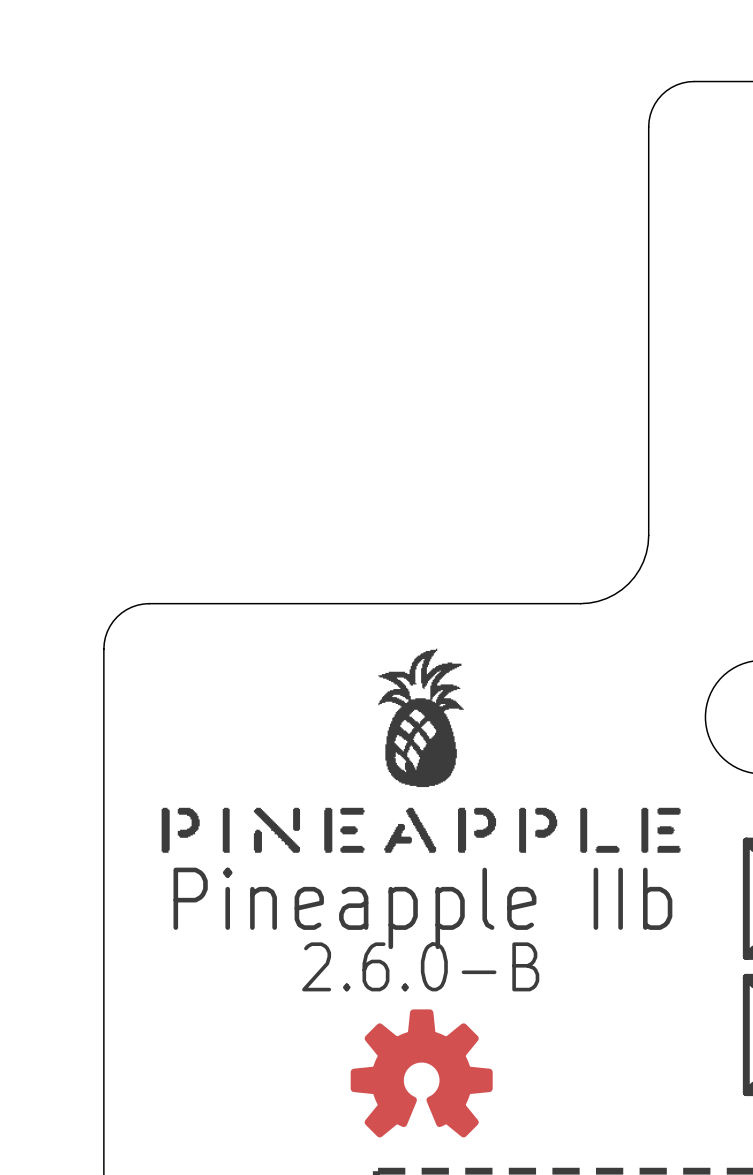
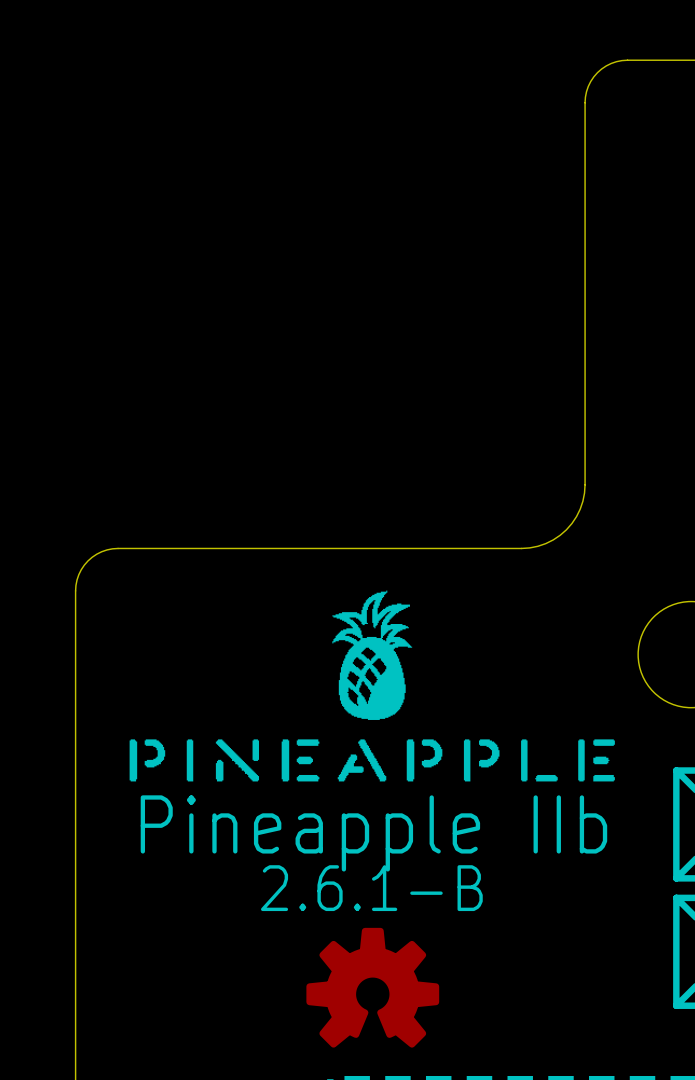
text: 2.6.0-B (420, 966) -> 2.6.1-B (371, 888)

